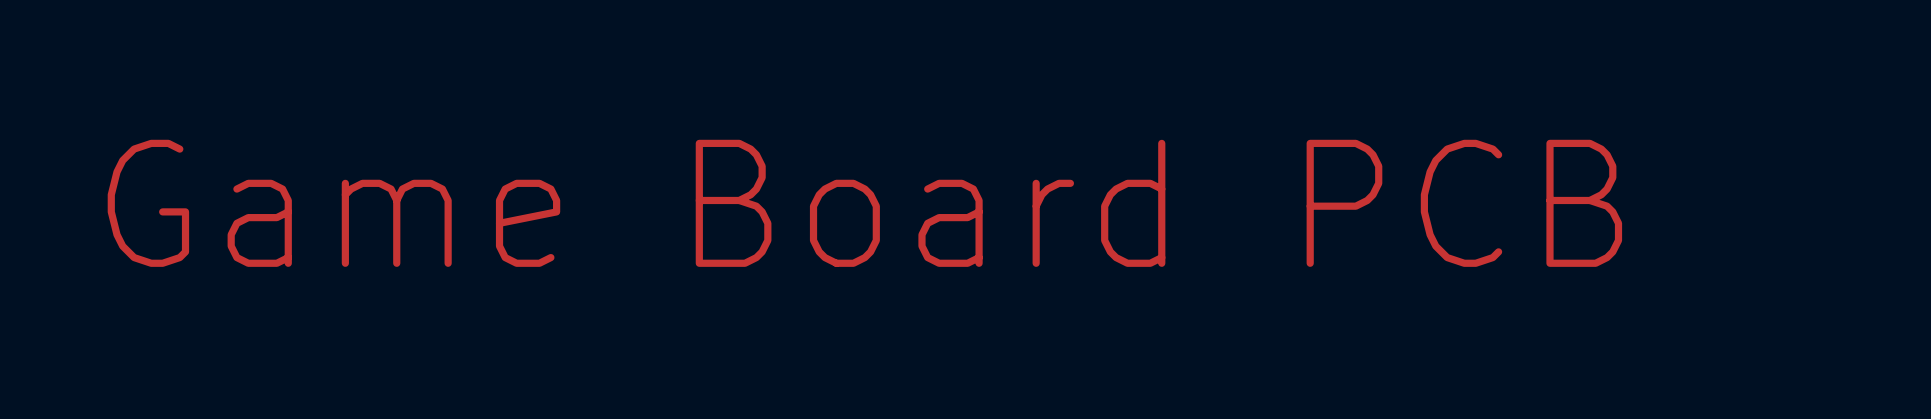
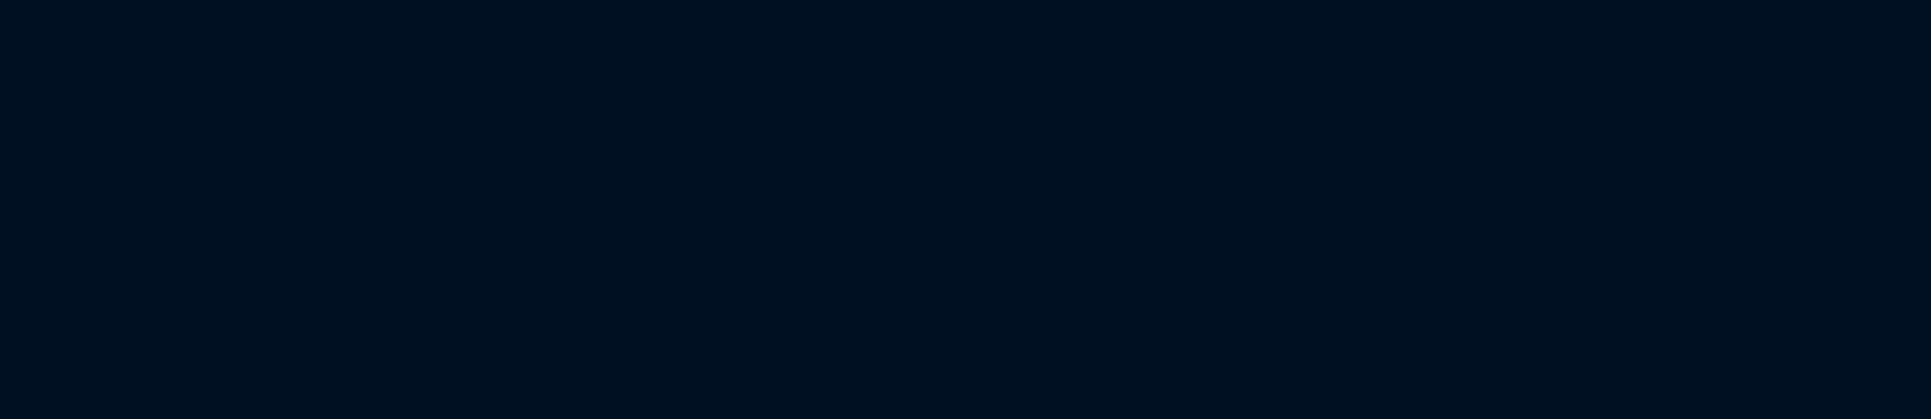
text: Game Board PCB (864, 203) -> none

